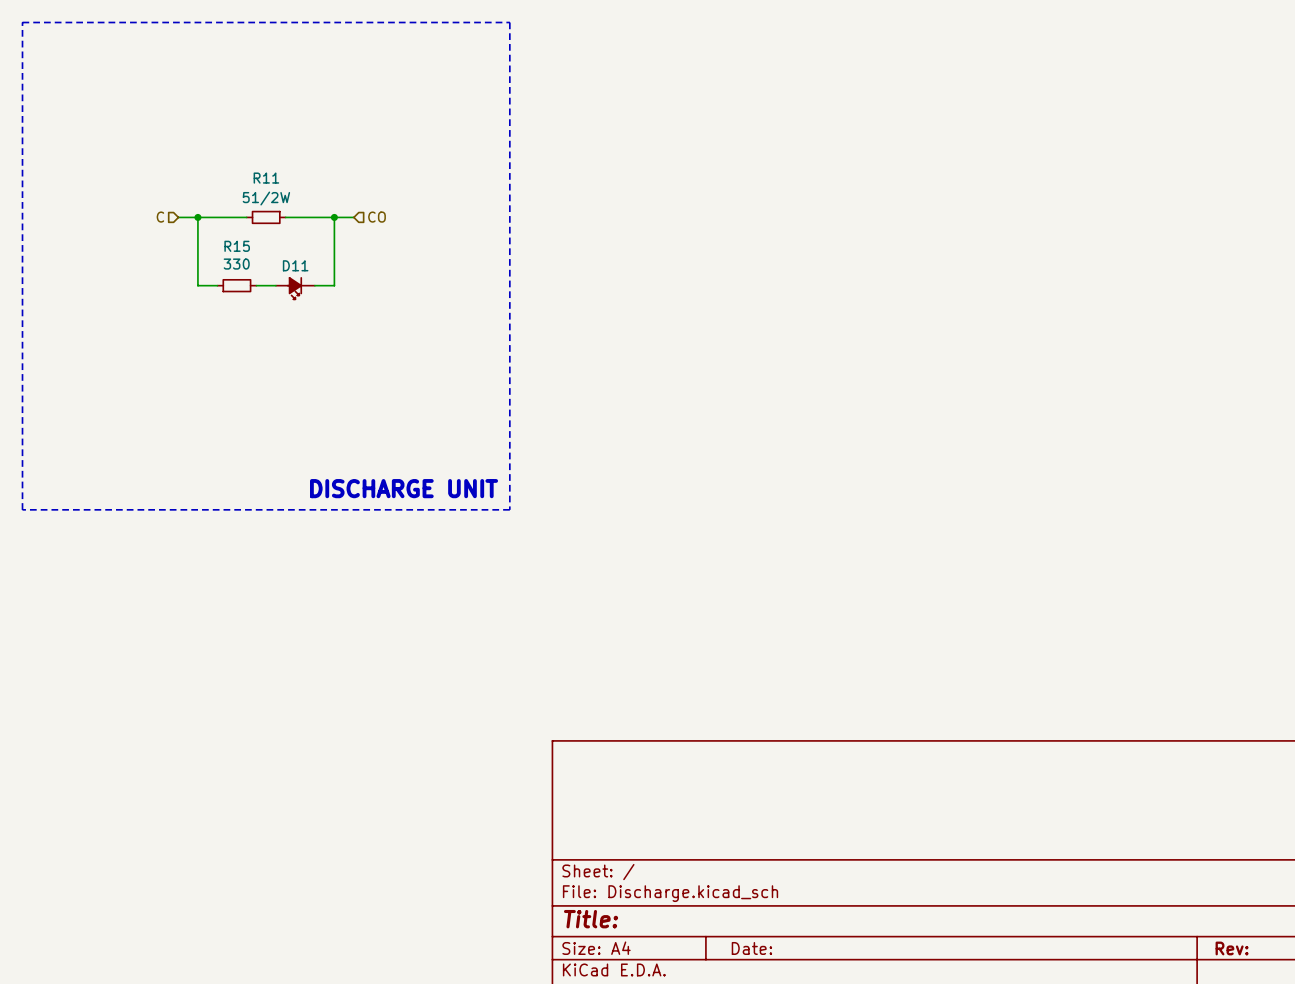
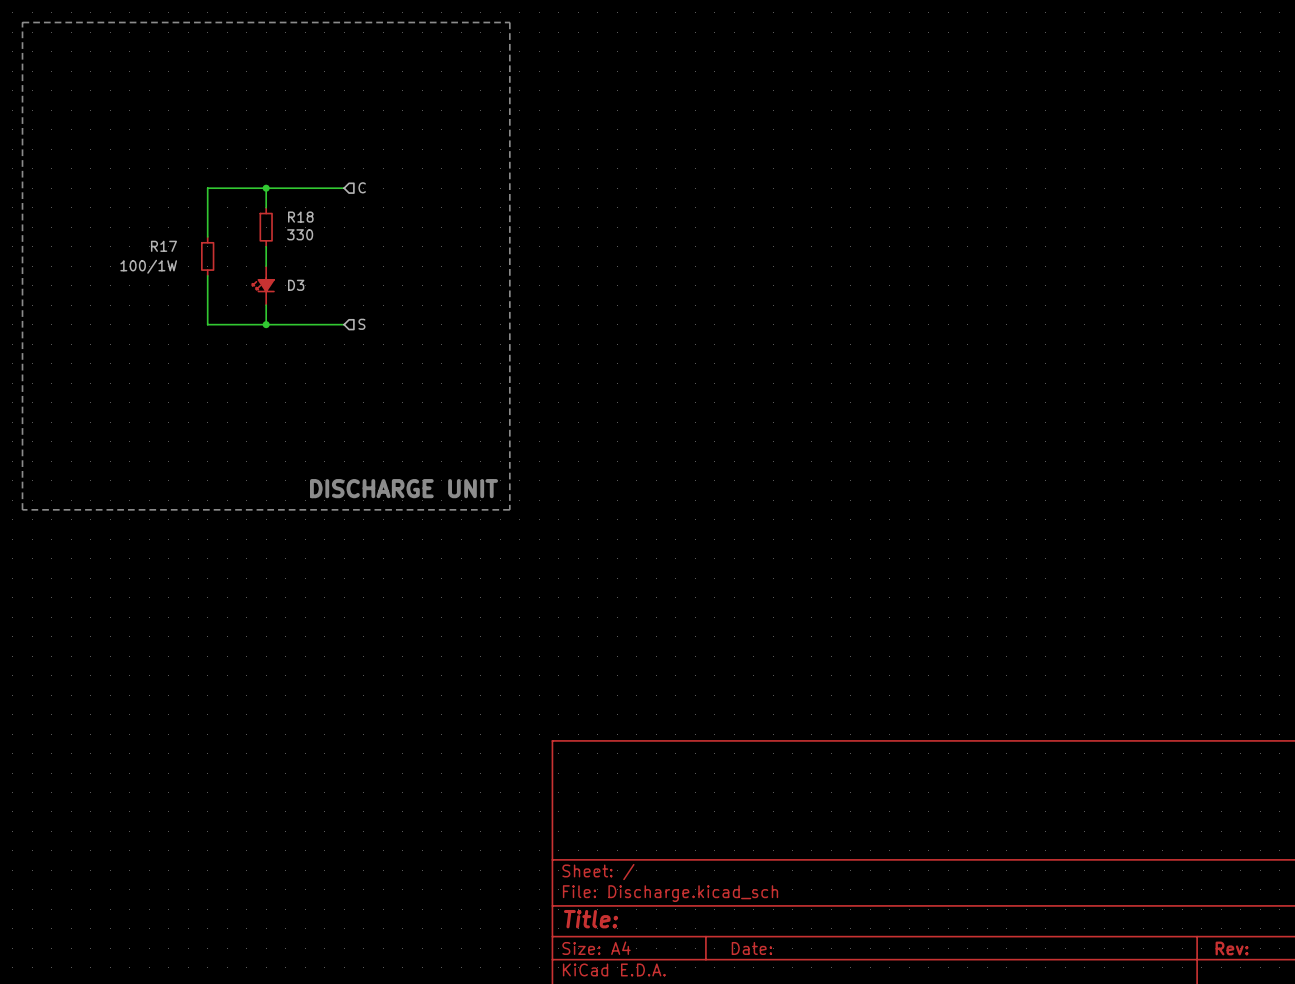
hierarchical label: none -> C (362, 187)
wire: none -> (266, 188) (266, 207)
junction: none -> (266, 188)
wire: none -> (344, 188) (207, 188) (207, 236)
hierarchical label: C (160, 217) -> none
wire: (178, 217) (246, 217) -> none
wire: (197, 217) (197, 285) (217, 285) -> none
junction: (197, 217) -> none
R11: 51/2W (266, 217) -> none
wire: (285, 217) (353, 217) -> none
wire: (334, 217) (334, 285) (314, 285) -> none
junction: (334, 217) -> none
hierarchical label: CO (377, 217) -> none
R18: none -> 330 (266, 227)
wire: none -> (266, 246) (266, 266)
R17: none -> 100/1W (207, 256)
wire: none -> (207, 275) (207, 324) (344, 324)
R15: 330 (236, 285) -> none
D3: none -> (263, 285)
D11: (295, 288) -> none
wire: none -> (266, 305) (266, 324)
junction: none -> (266, 324)
hierarchical label: none -> S (361, 324)

